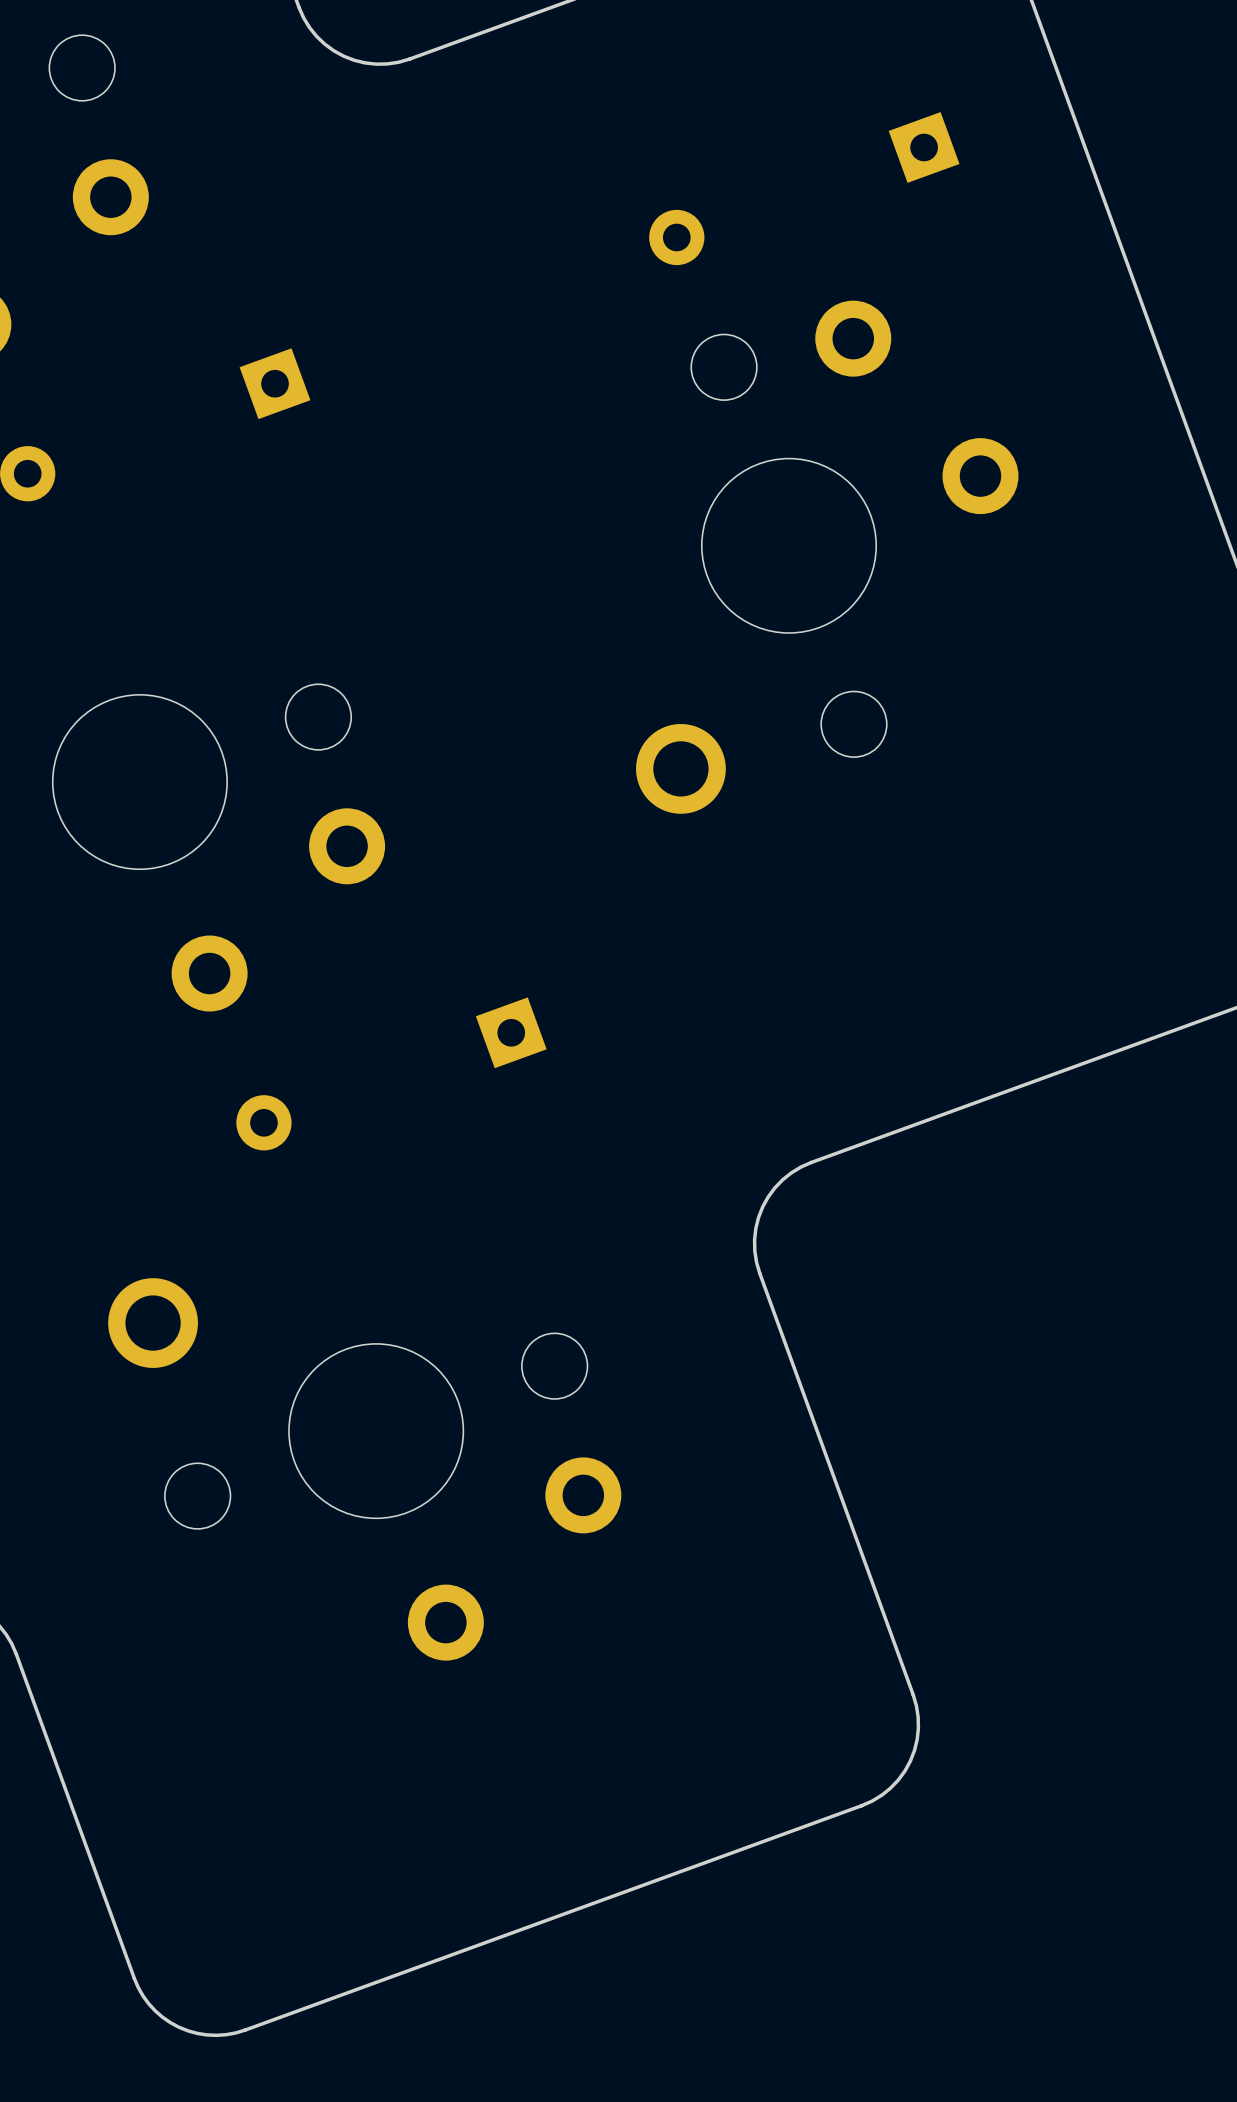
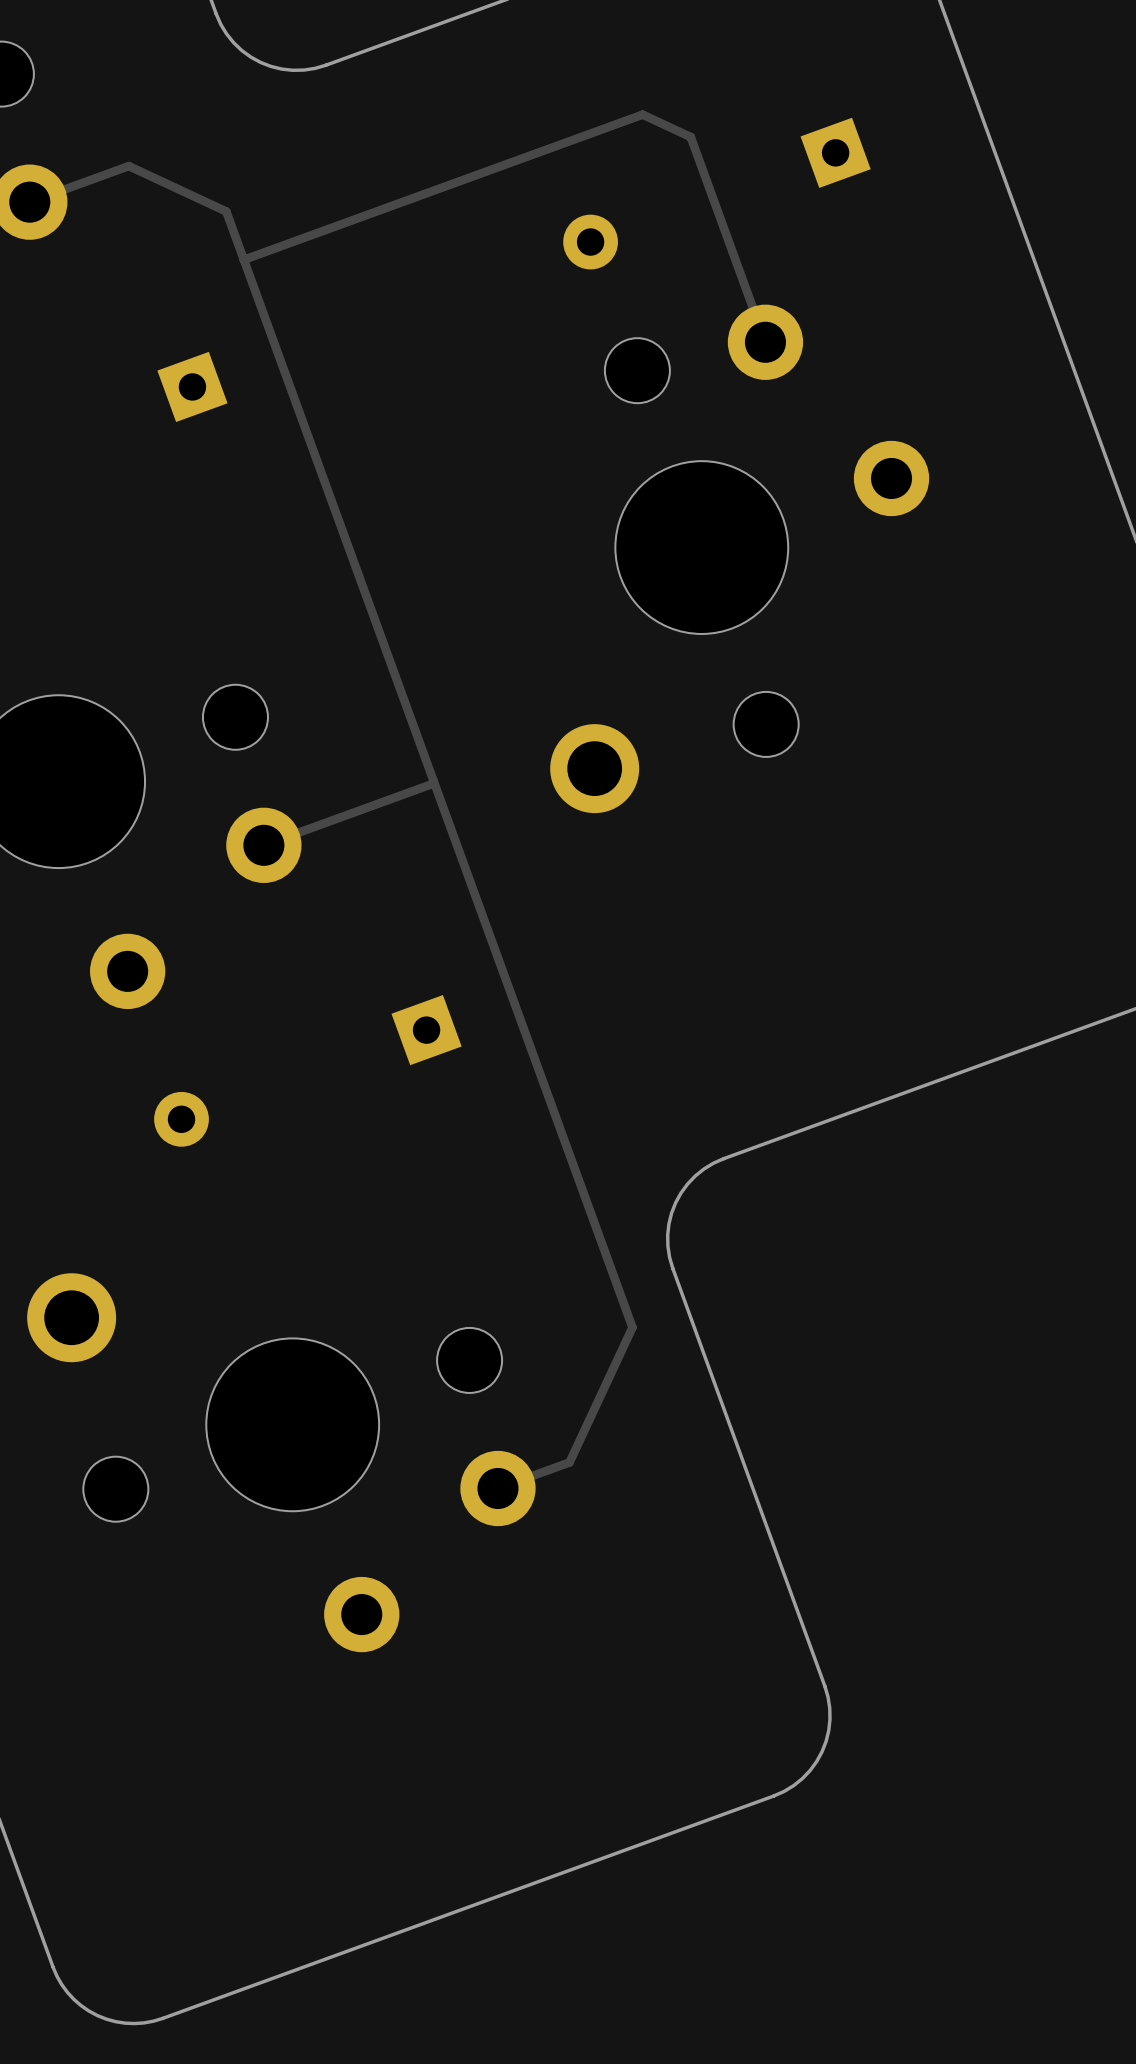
track: none -> (690, 137) (765, 342)
track: none -> (690, 137) (642, 114) (243, 259)
track: none -> (29, 202) (128, 166) (226, 211) (632, 1327) (569, 1462) (497, 1488)
track: none -> (433, 780) (431, 784) (263, 845)

